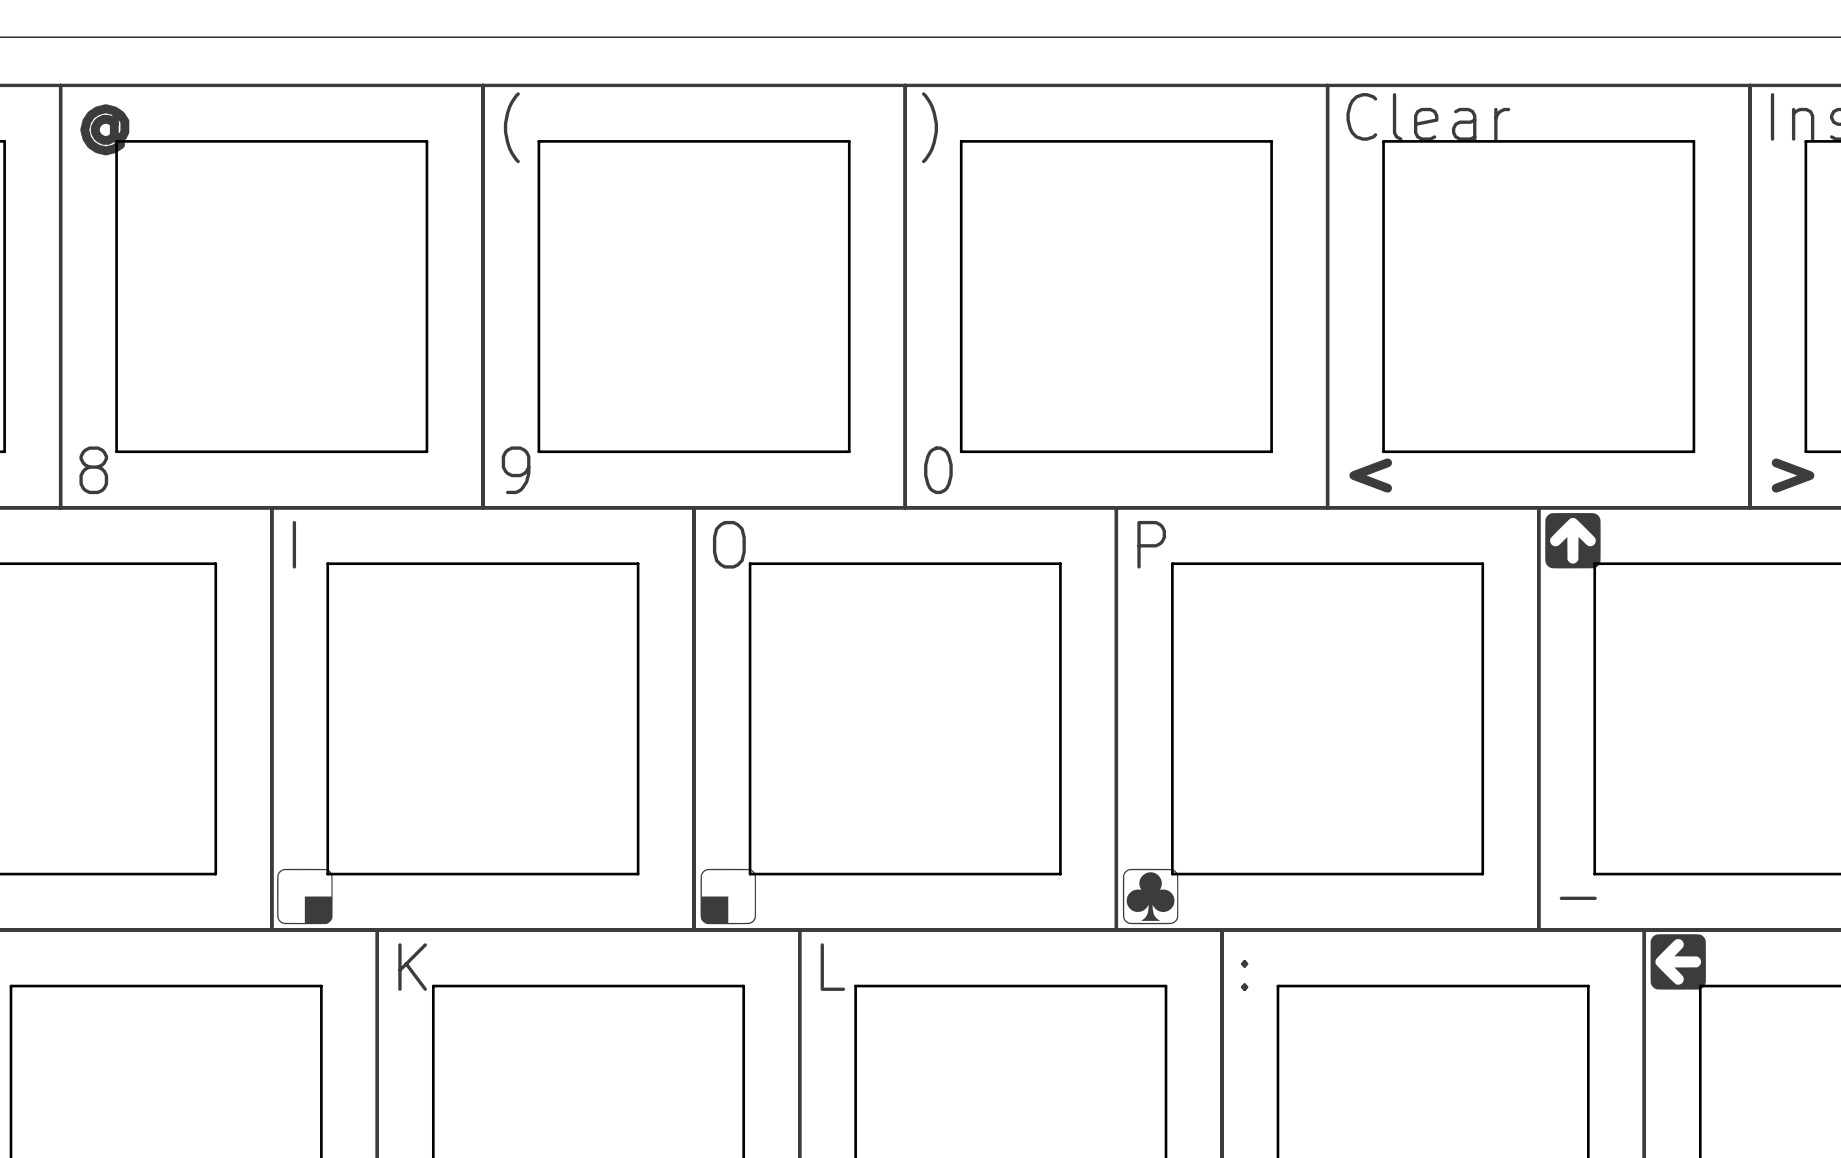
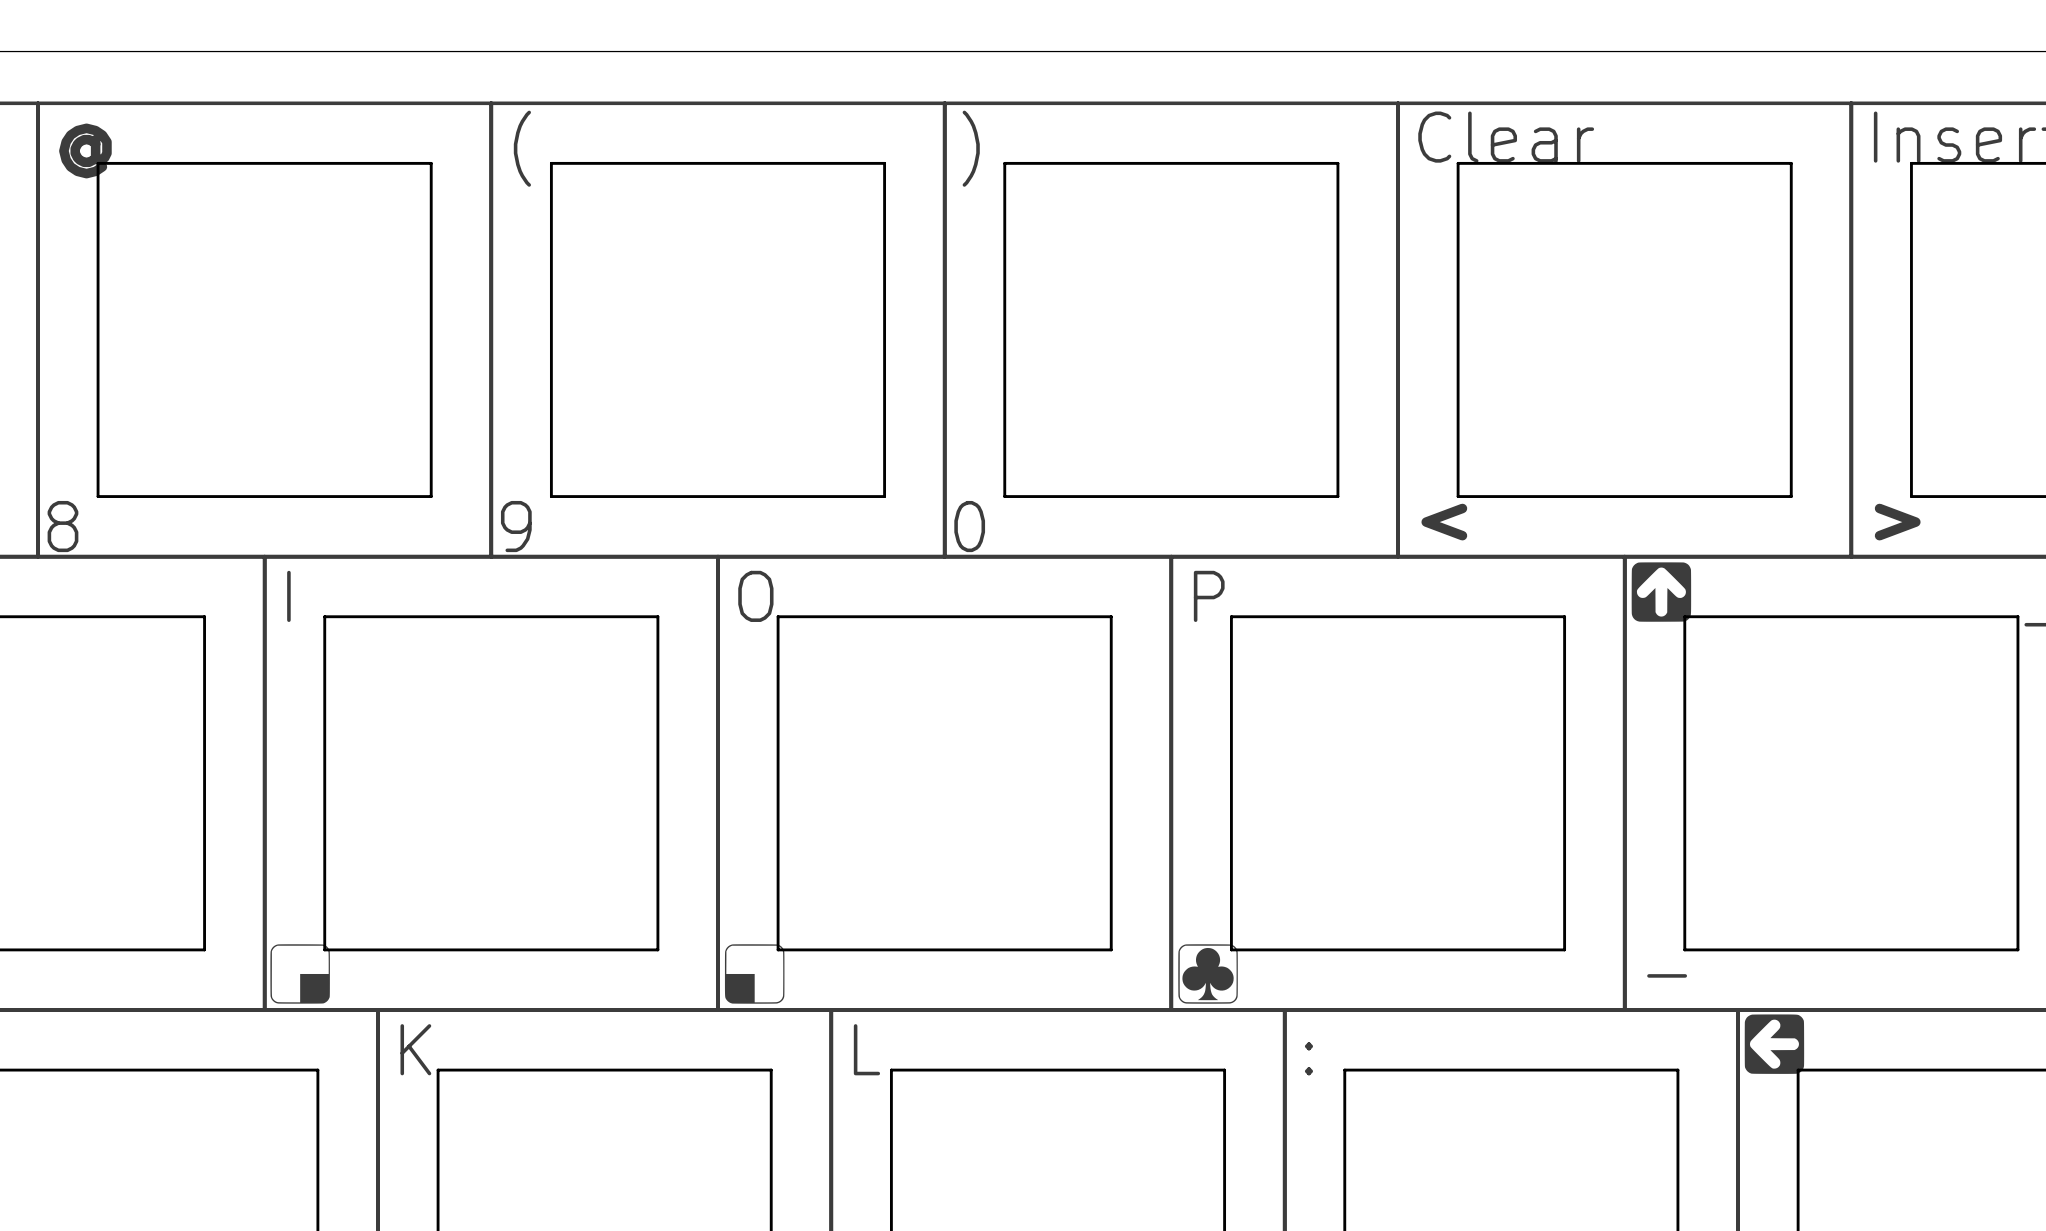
text position: 8 (93, 470) -> 8 (62, 526)
text position: 9 (516, 470) -> 9 (516, 526)
text position: 0 (938, 470) -> 0 (969, 526)

